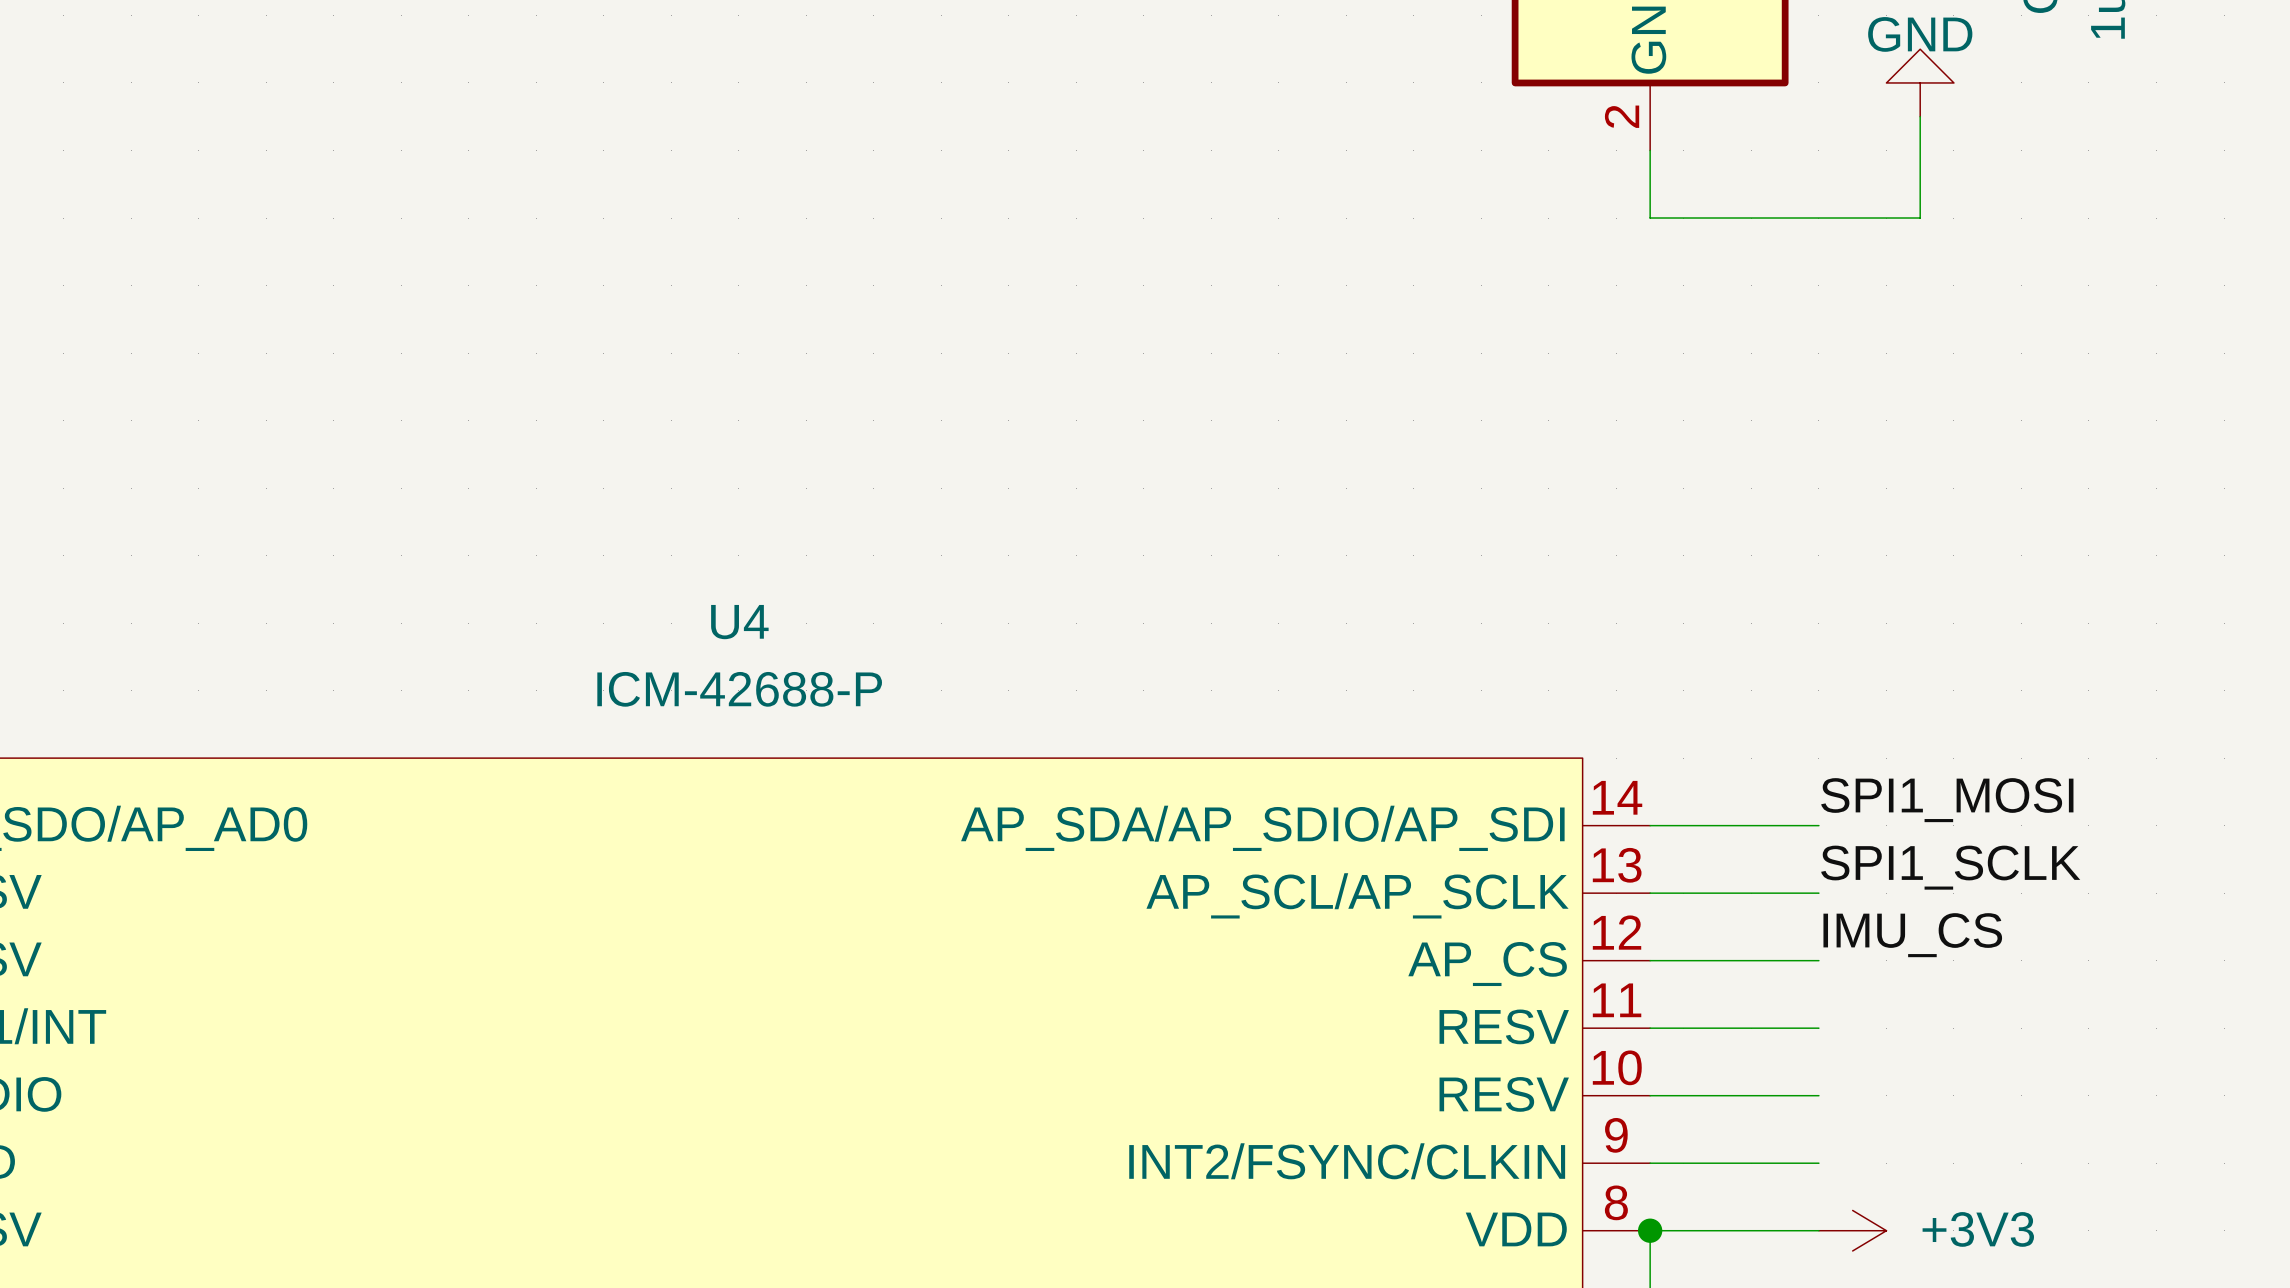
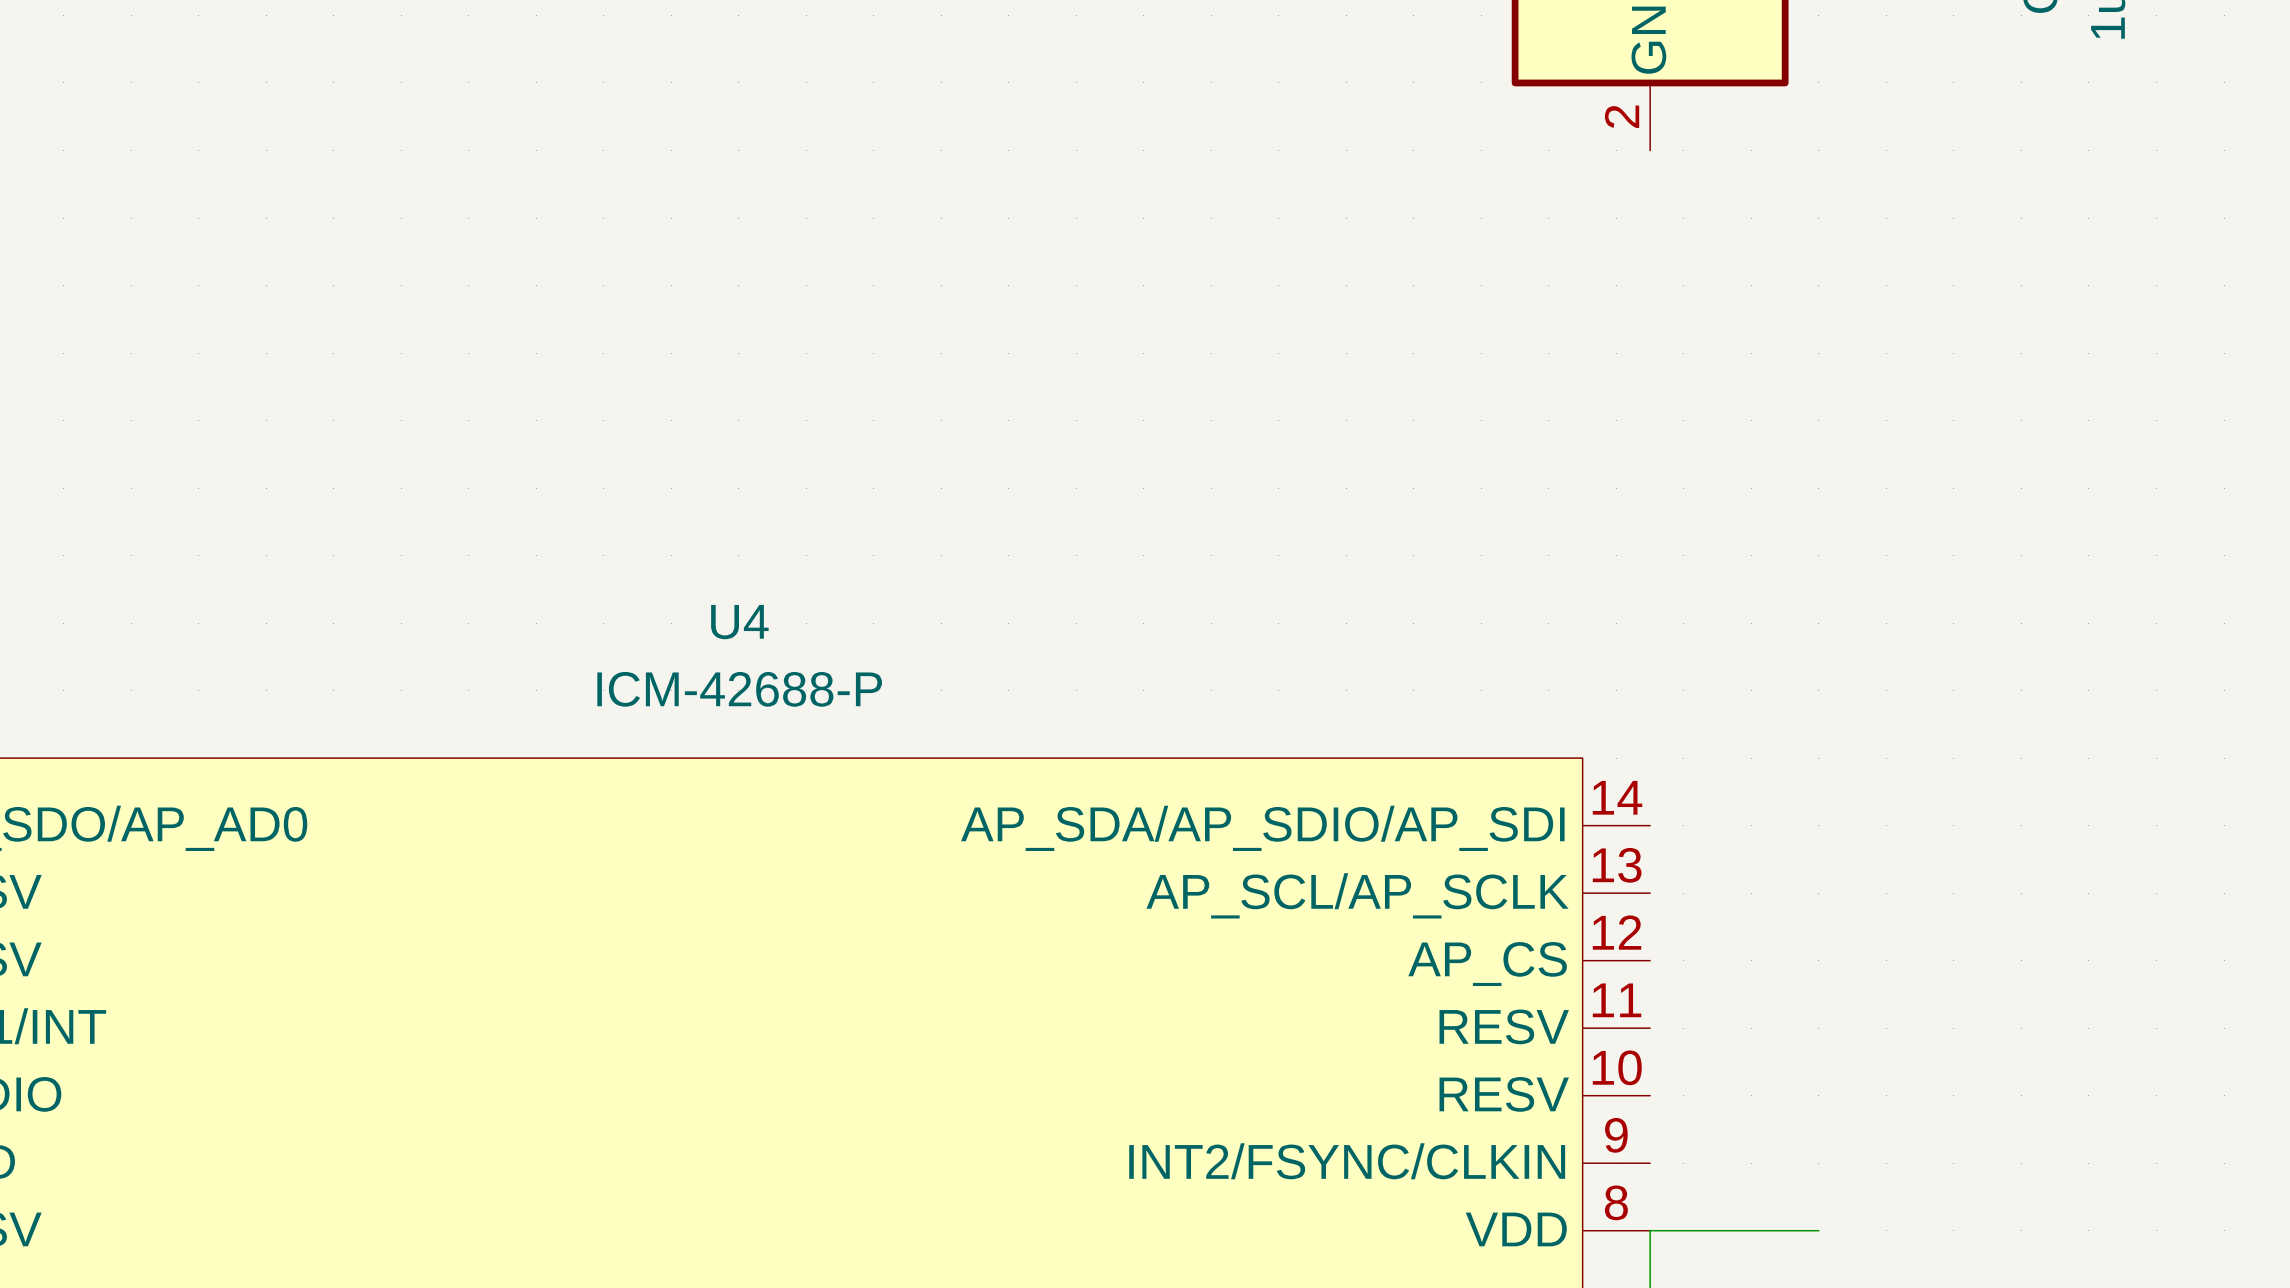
power symbol: GND (1920, 82) -> none
wire: (1920, 116) (1920, 218) (1650, 218) (1650, 150) -> none
label: SPI1_MOSI (1947, 800) -> none
wire: (1650, 825) (1818, 825) -> none
label: SPI1_SCLK (1950, 867) -> none
wire: (1650, 893) (1818, 893) -> none
label: IMU_CS (1912, 935) -> none
wire: (1650, 960) (1818, 960) -> none
wire: (1650, 1028) (1818, 1028) -> none
wire: (1650, 1095) (1818, 1095) -> none
wire: (1650, 1163) (1818, 1163) -> none
junction: (1650, 1230) -> none
power symbol: +3V3 (1852, 1230) -> none

